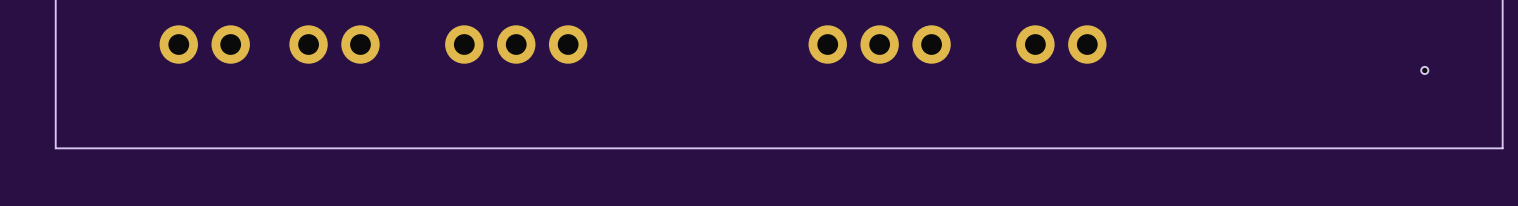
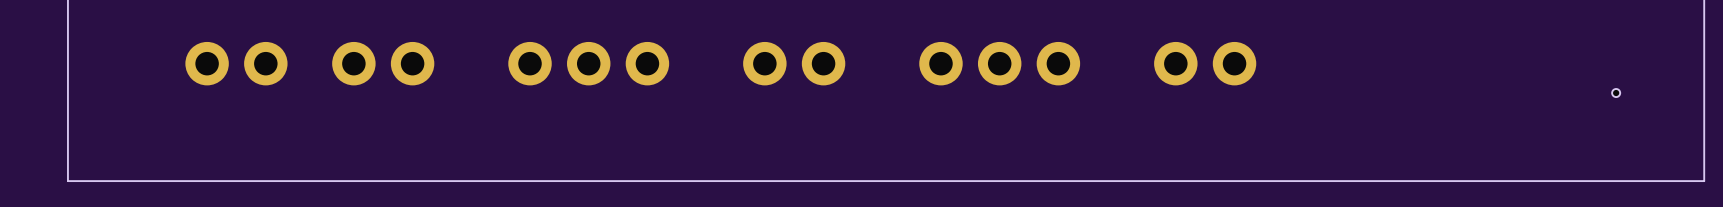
part: none -> (794, 63)

